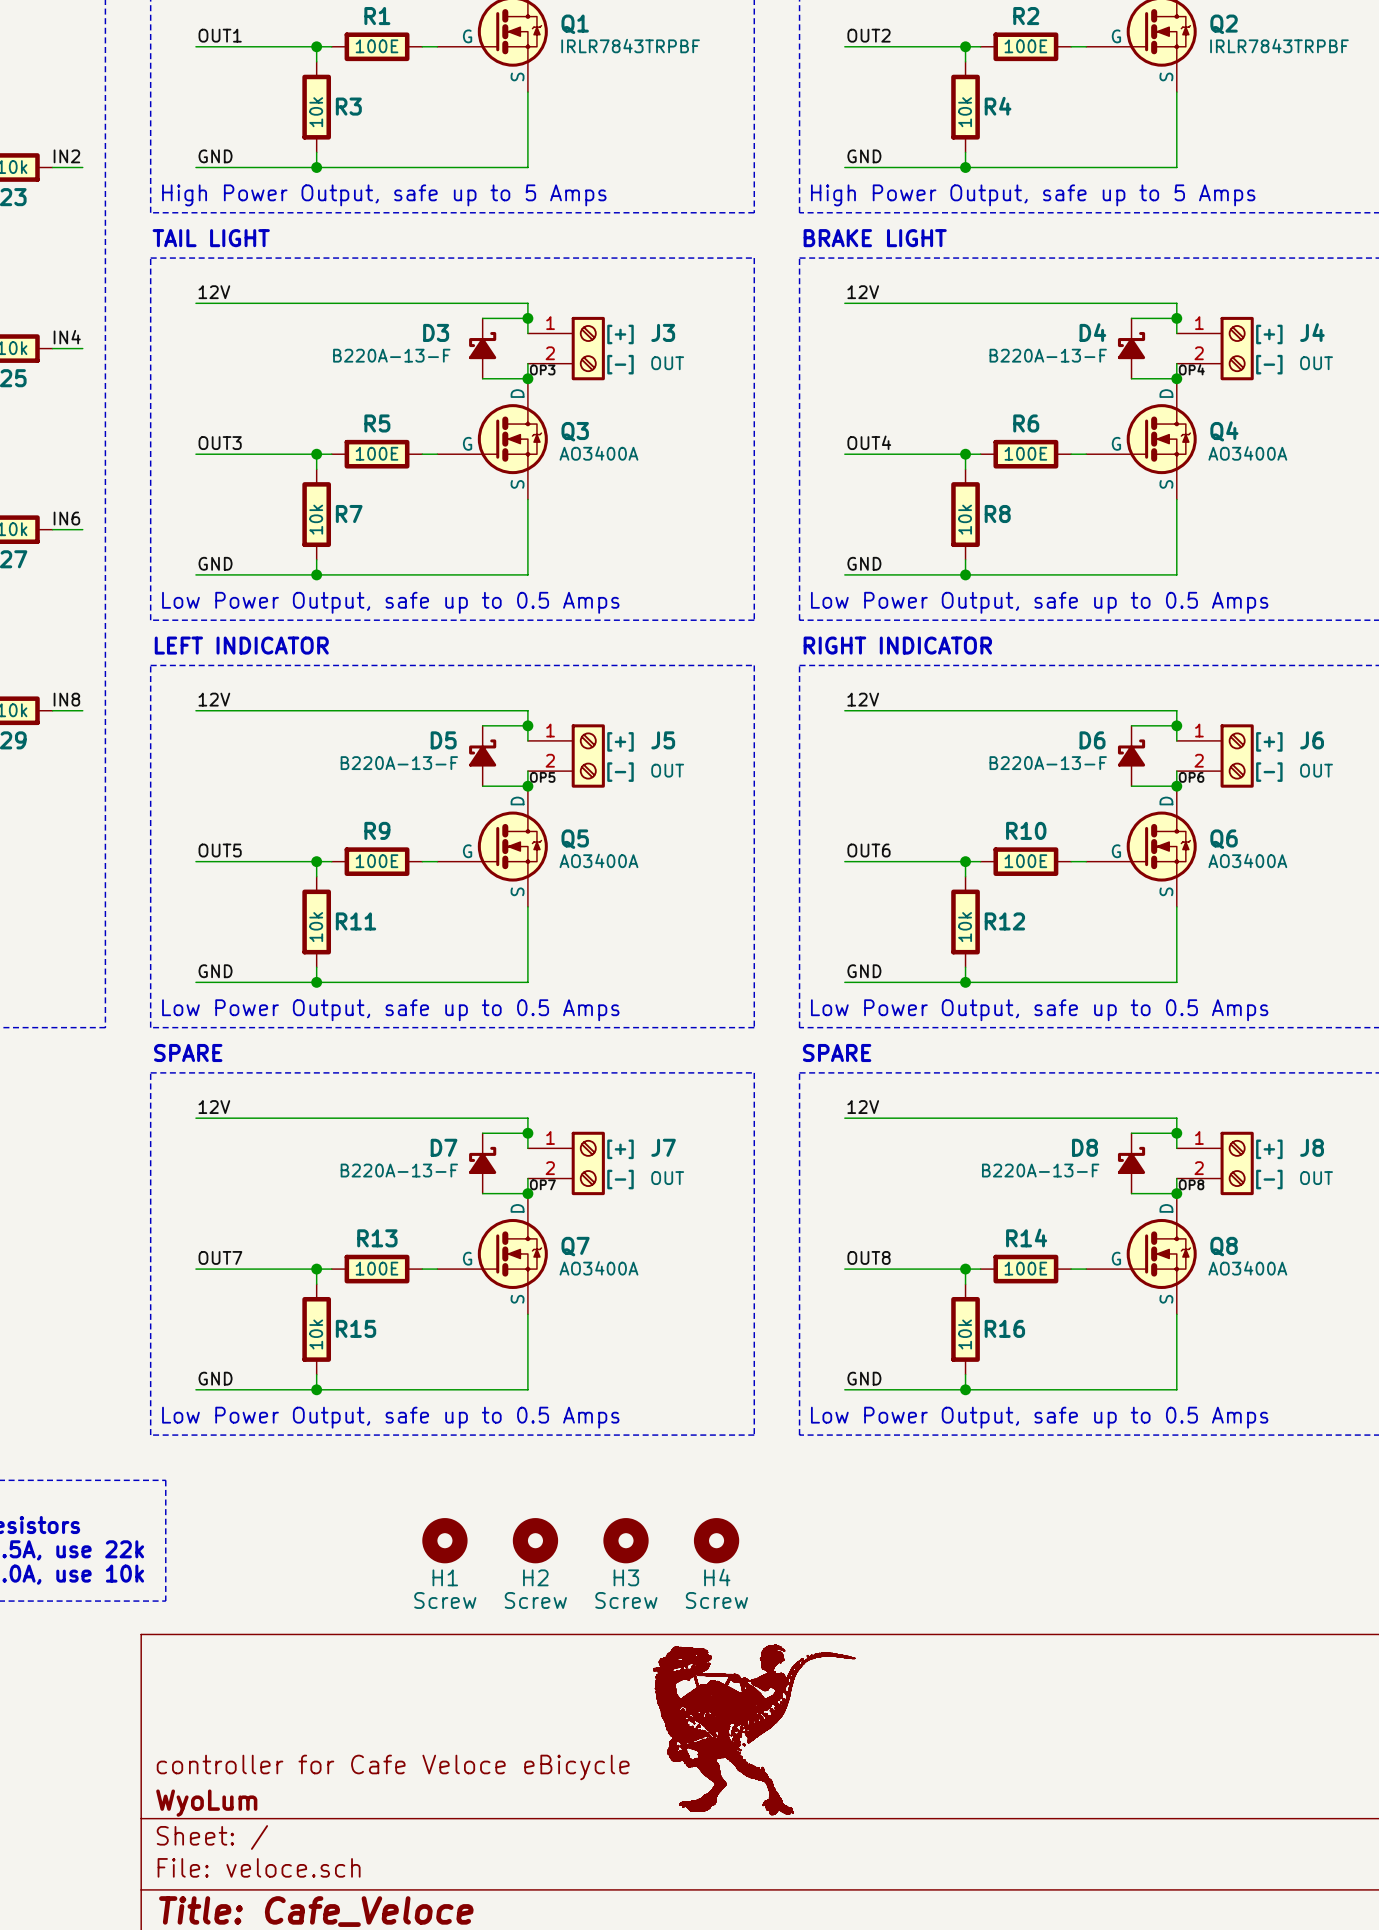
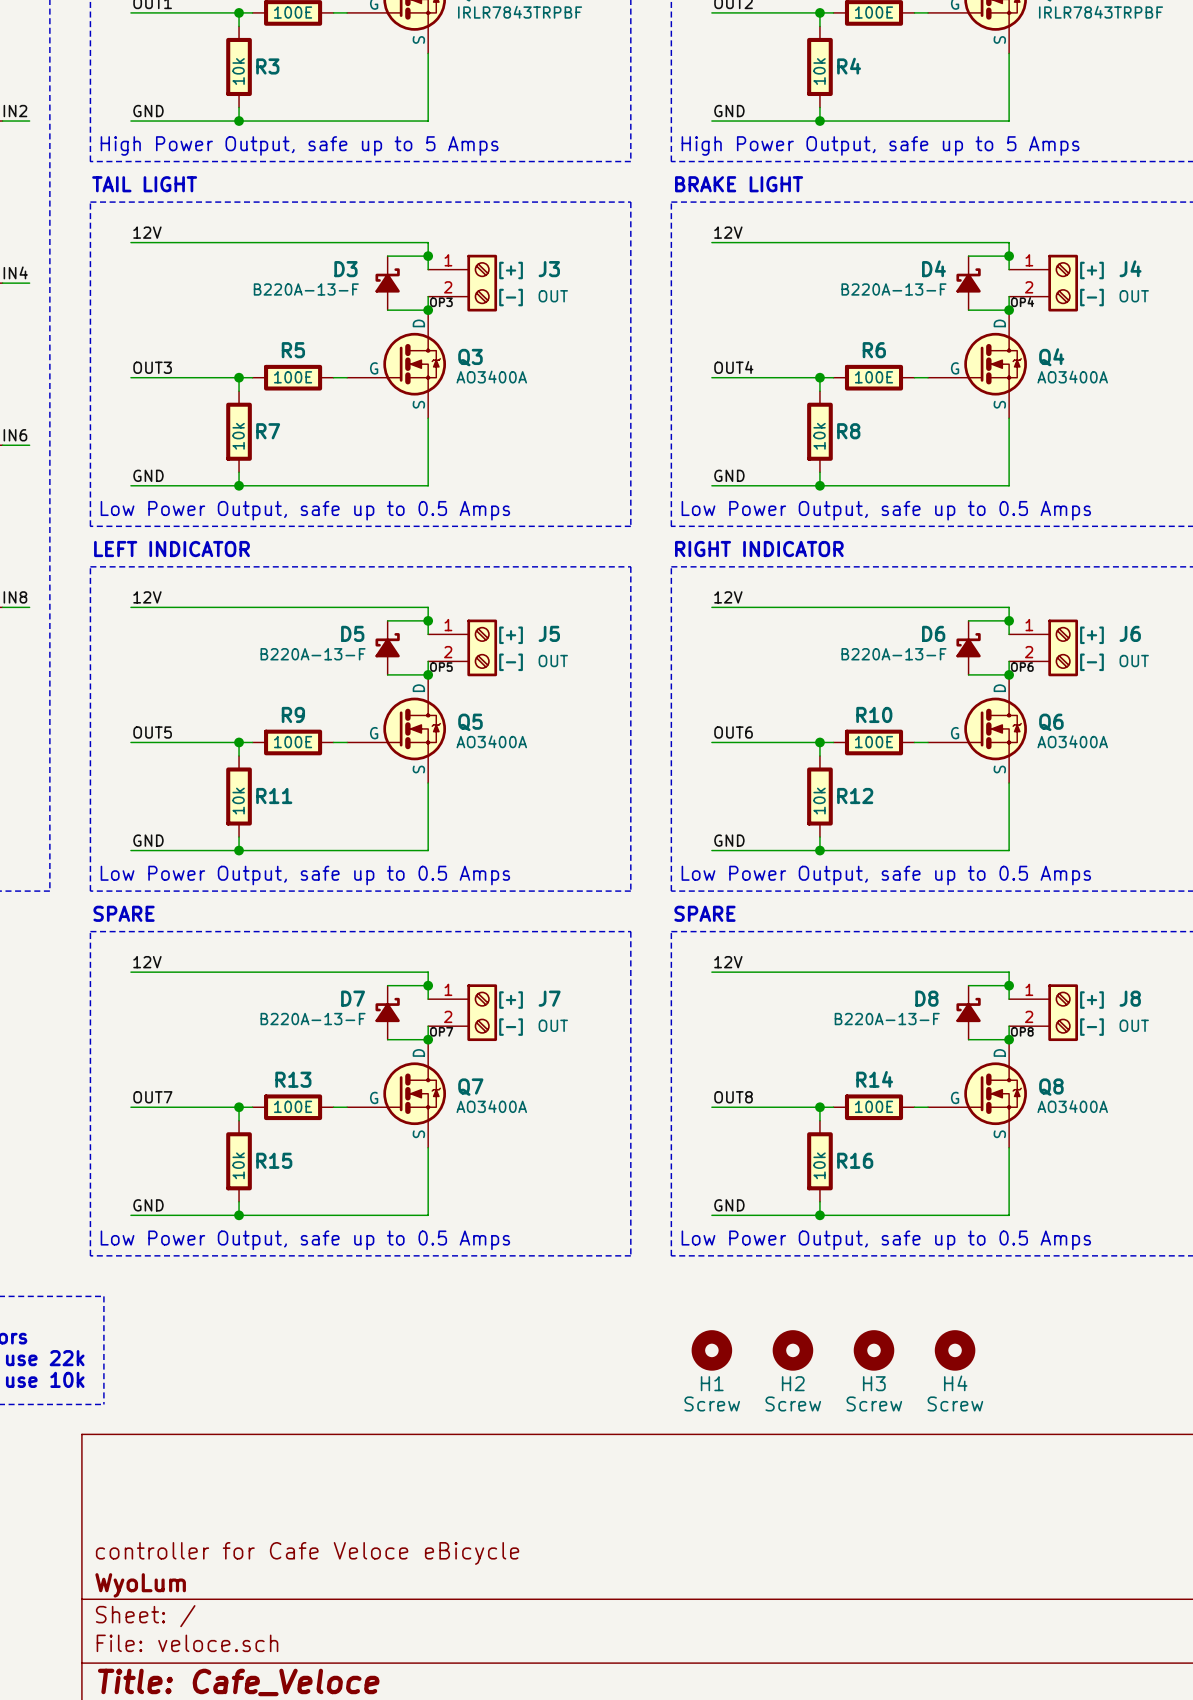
H1 position: (444, 1540) -> (711, 1350)
H2 position: (535, 1540) -> (792, 1350)
H3 position: (626, 1540) -> (874, 1350)
H4 position: (716, 1540) -> (955, 1350)
part: (754, 1729) -> none

